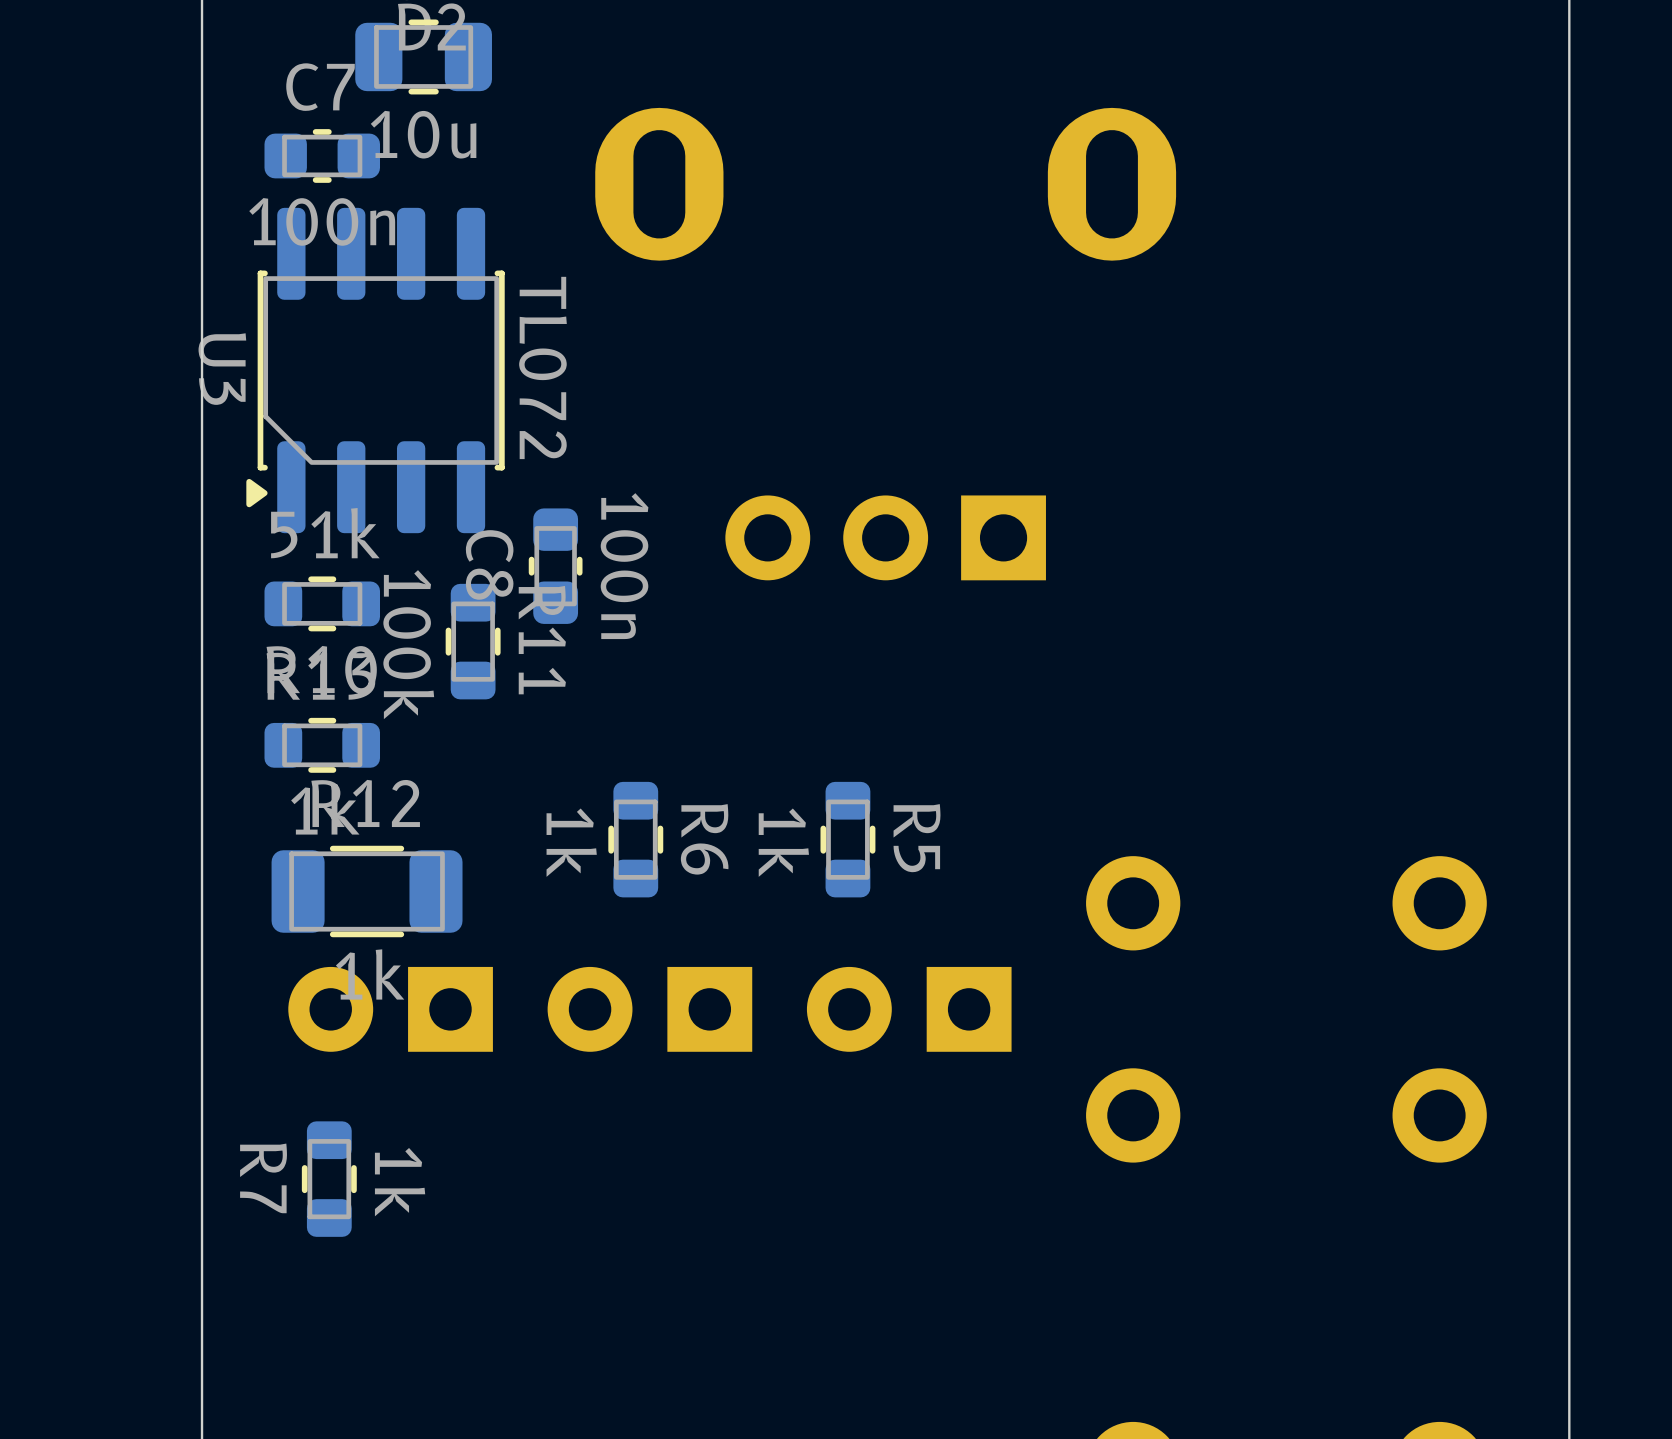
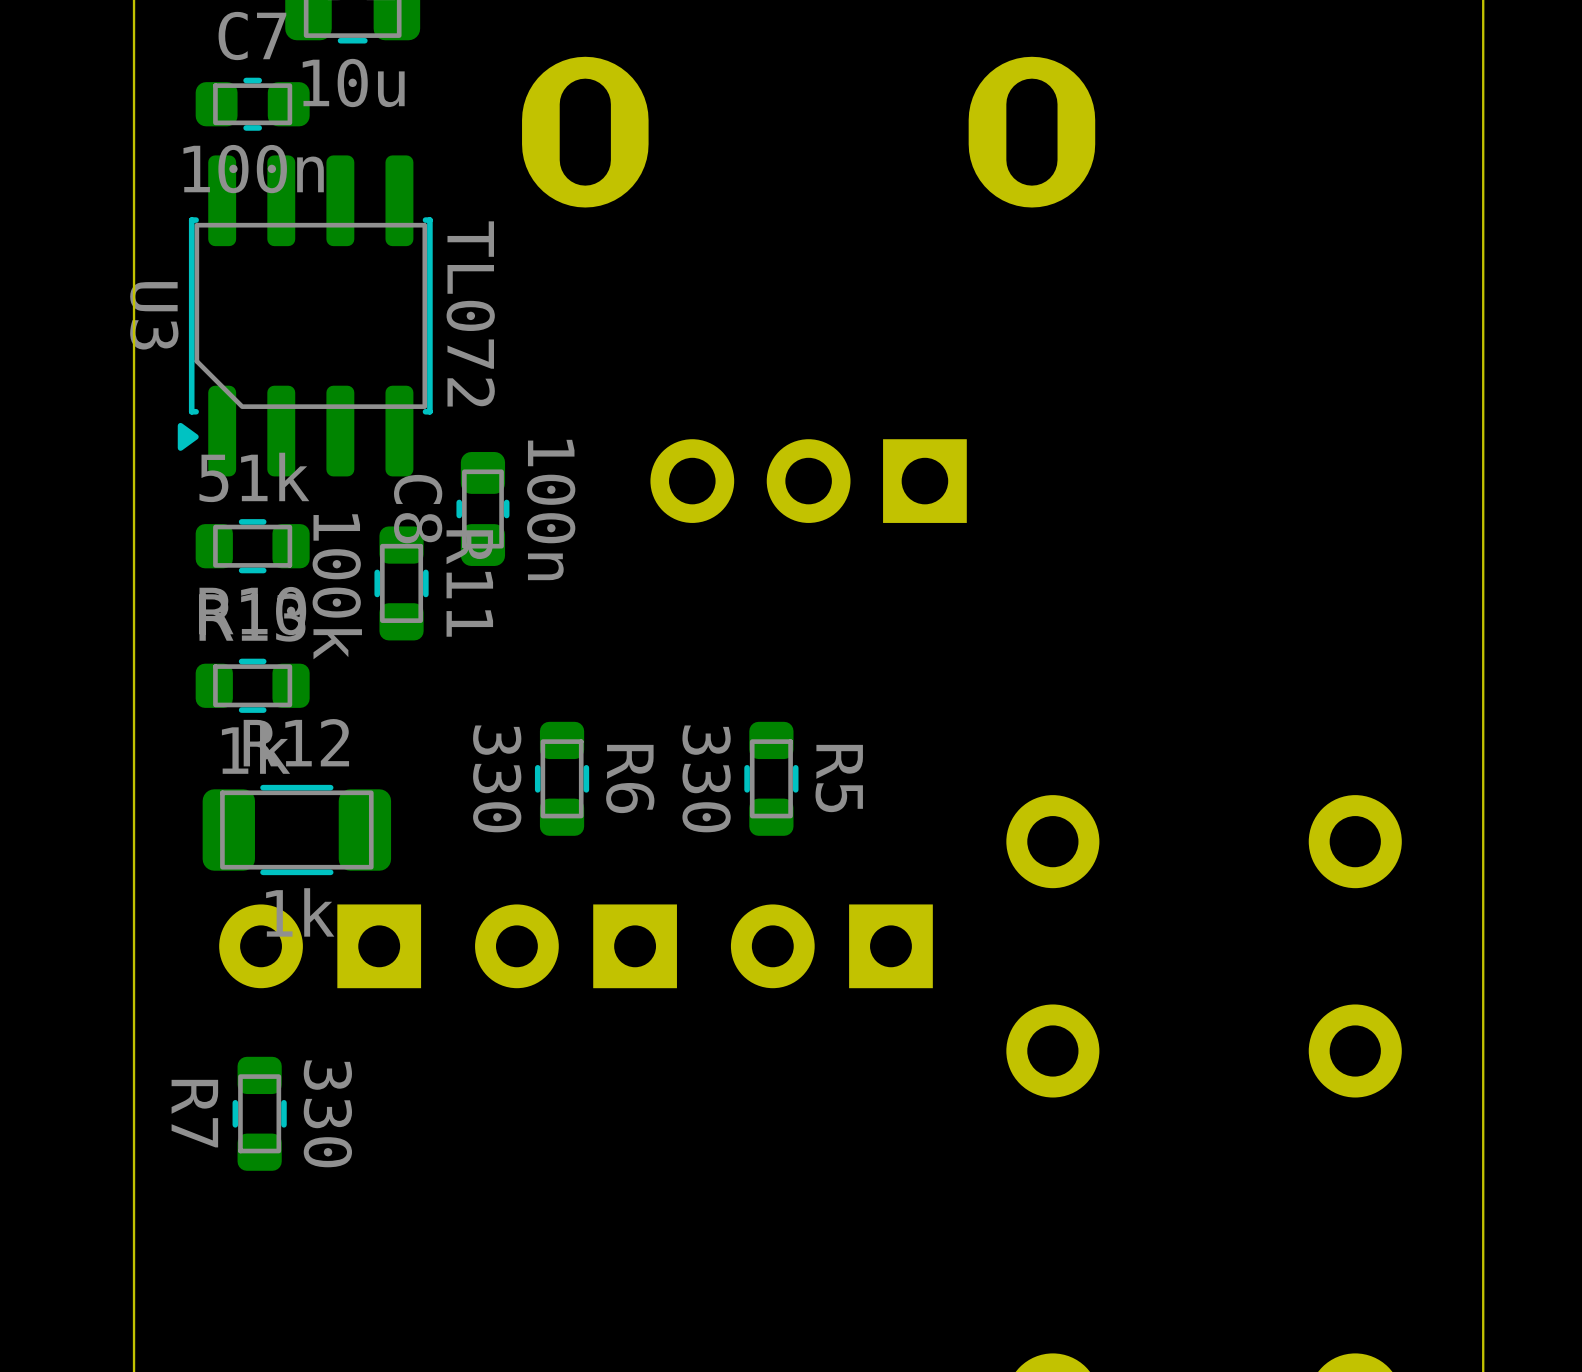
R6 value: 1k (571, 842) -> 330 (497, 778)
R5 value: 1k (783, 842) -> 330 (706, 778)
R7 value: 1k (400, 1182) -> 330 (327, 1113)

